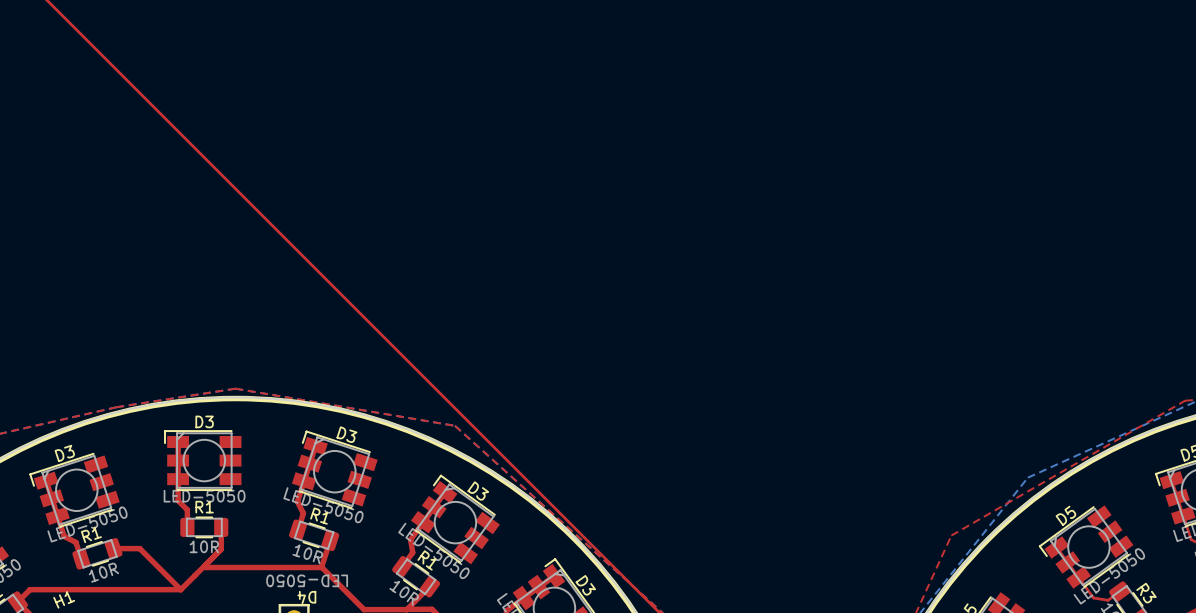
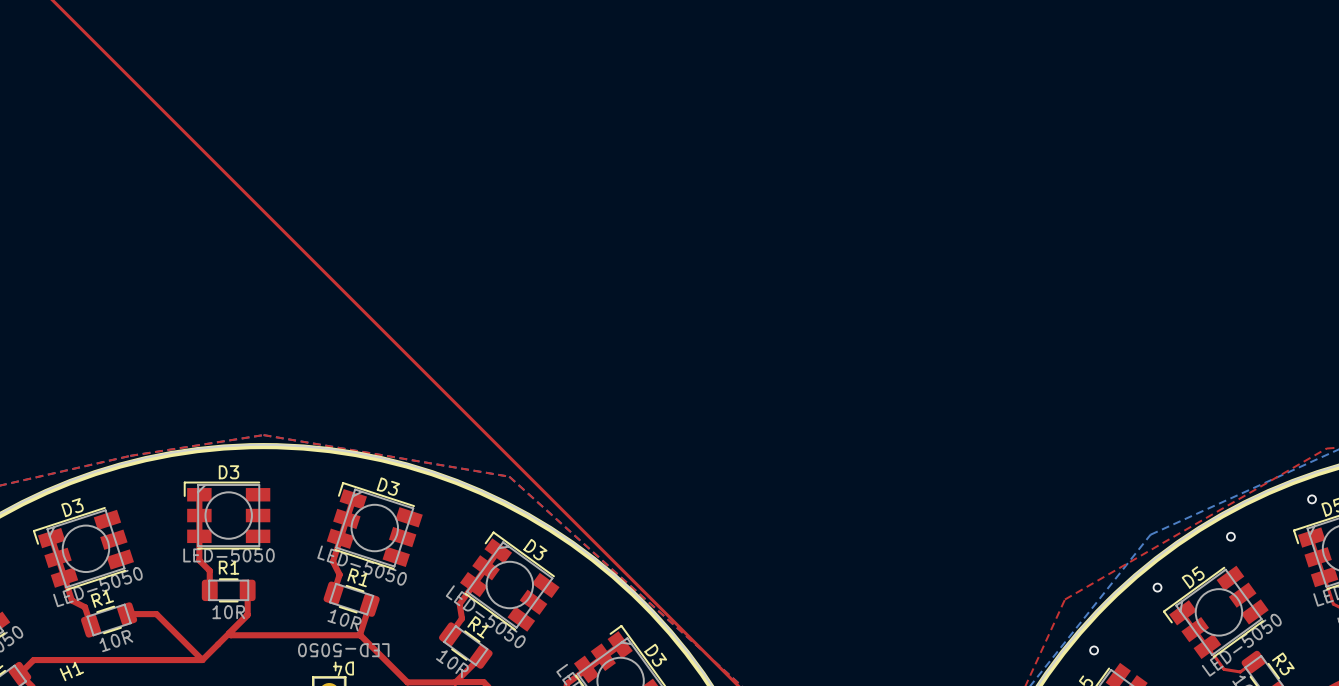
via: none -> (1312, 499)
via: none -> (1230, 536)
via: none -> (1157, 587)
via: none -> (1094, 650)

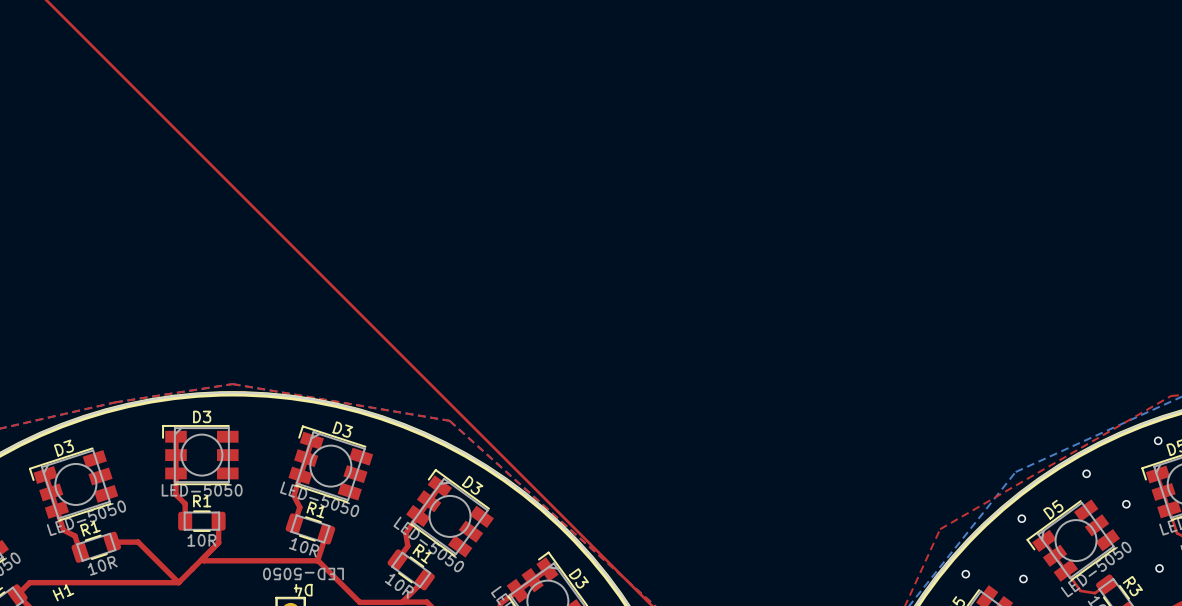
via: none -> (1126, 504)
via: none -> (1159, 568)
via: none -> (1023, 579)

